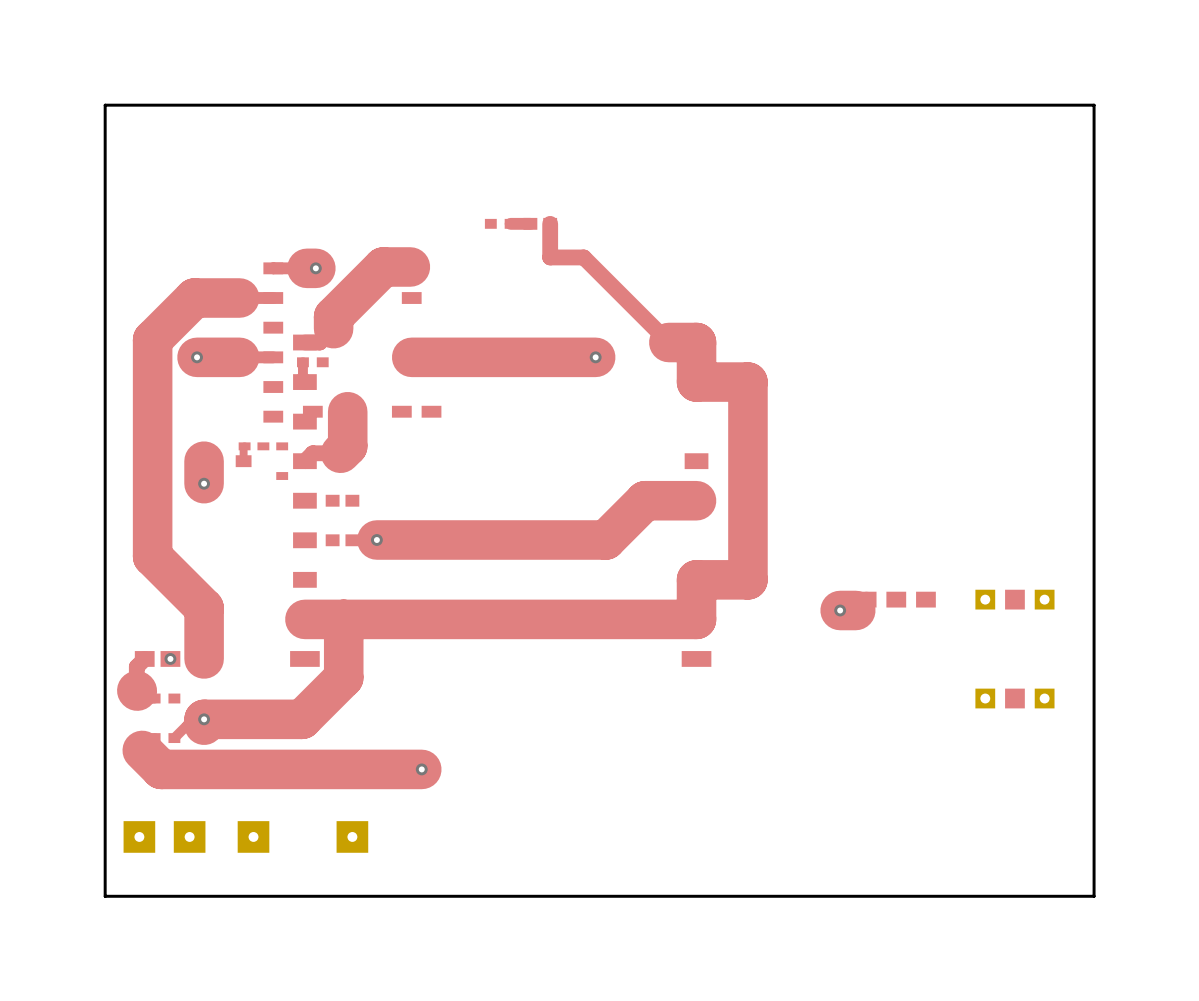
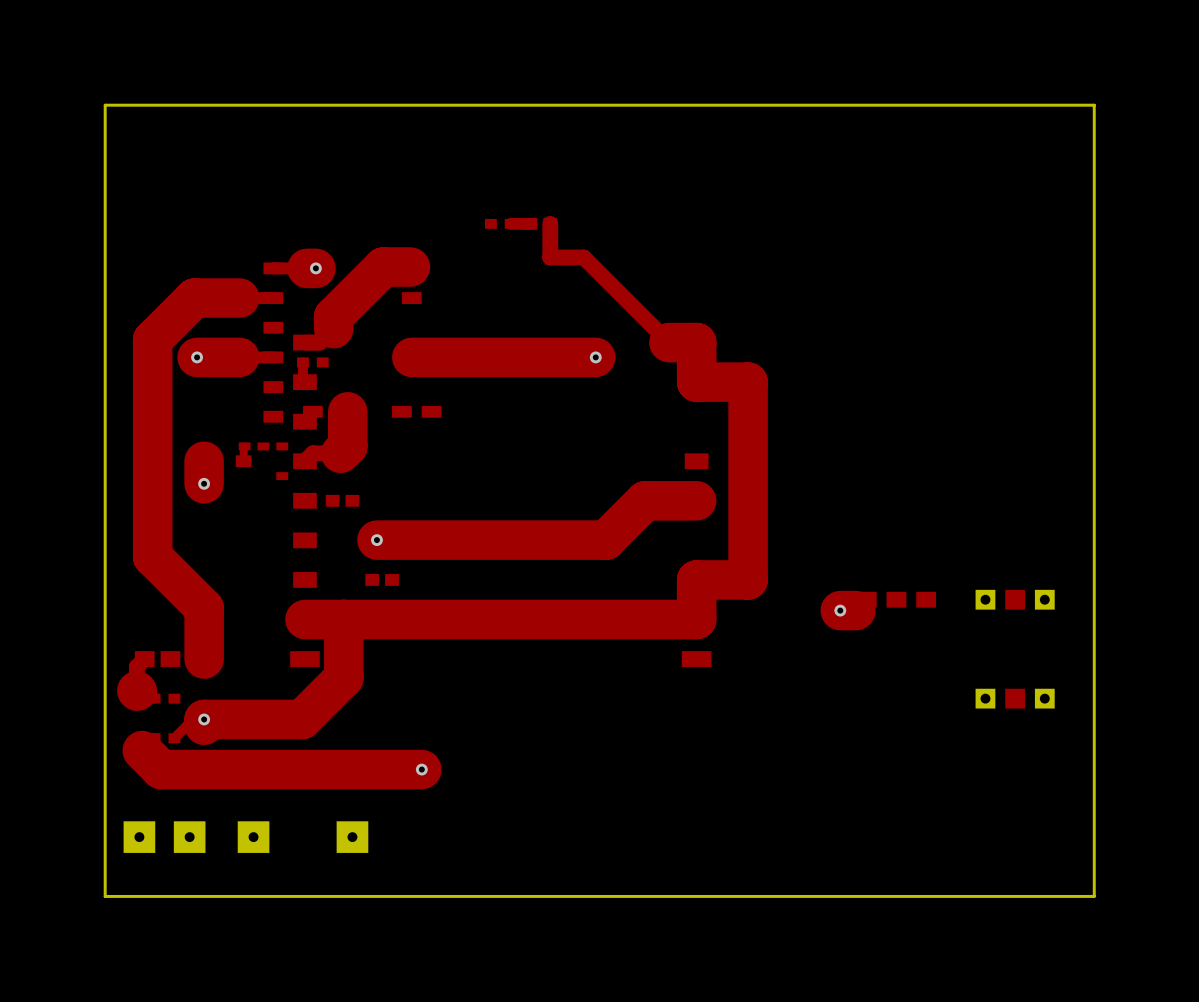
part position: (342, 540) -> (382, 579)
via: (170, 658) -> none

